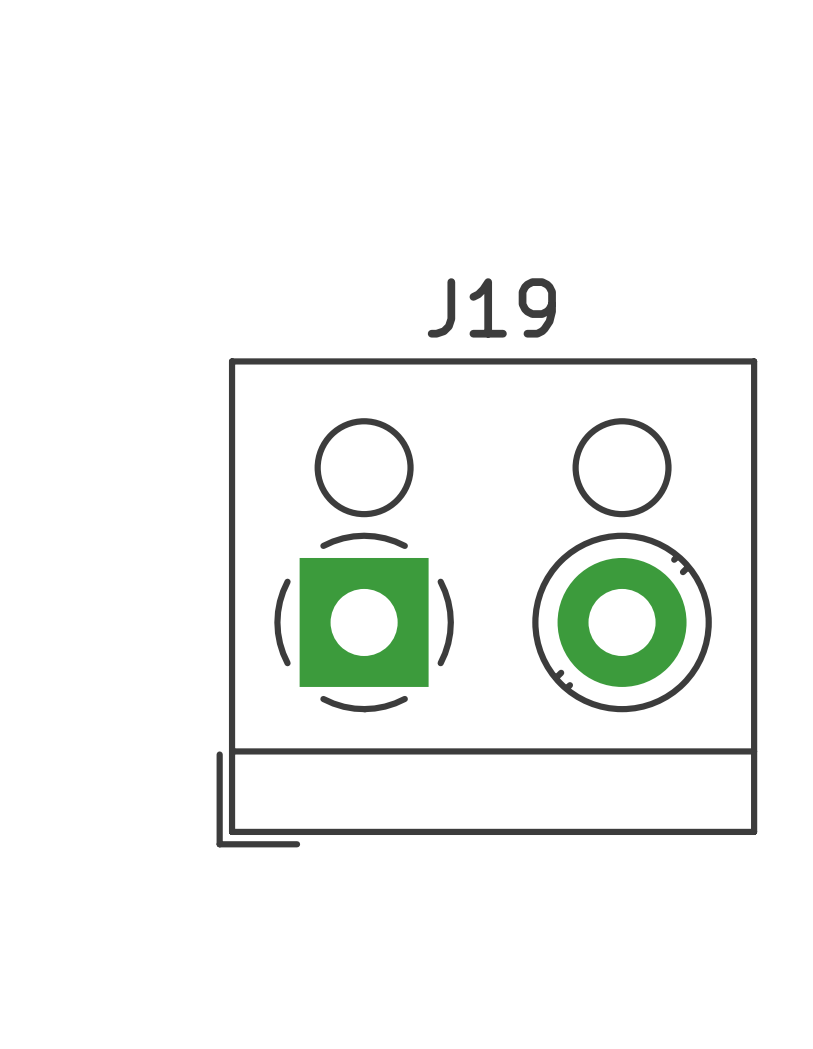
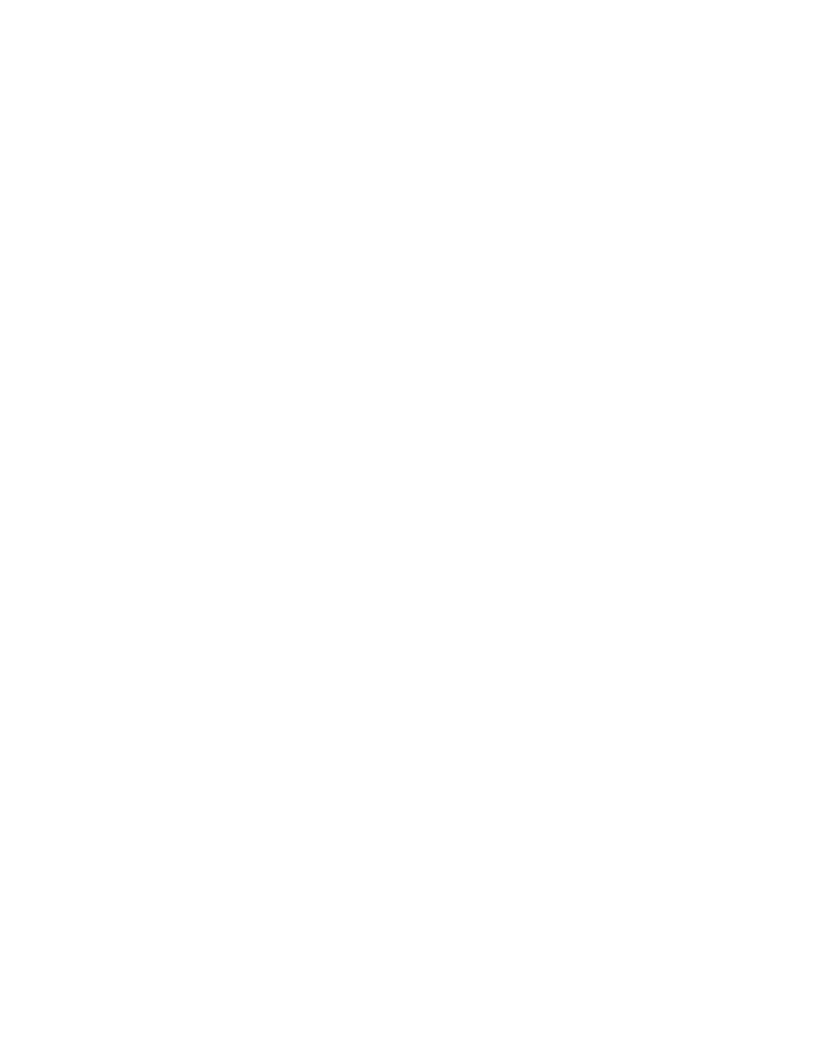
J19: (486, 602) -> none

